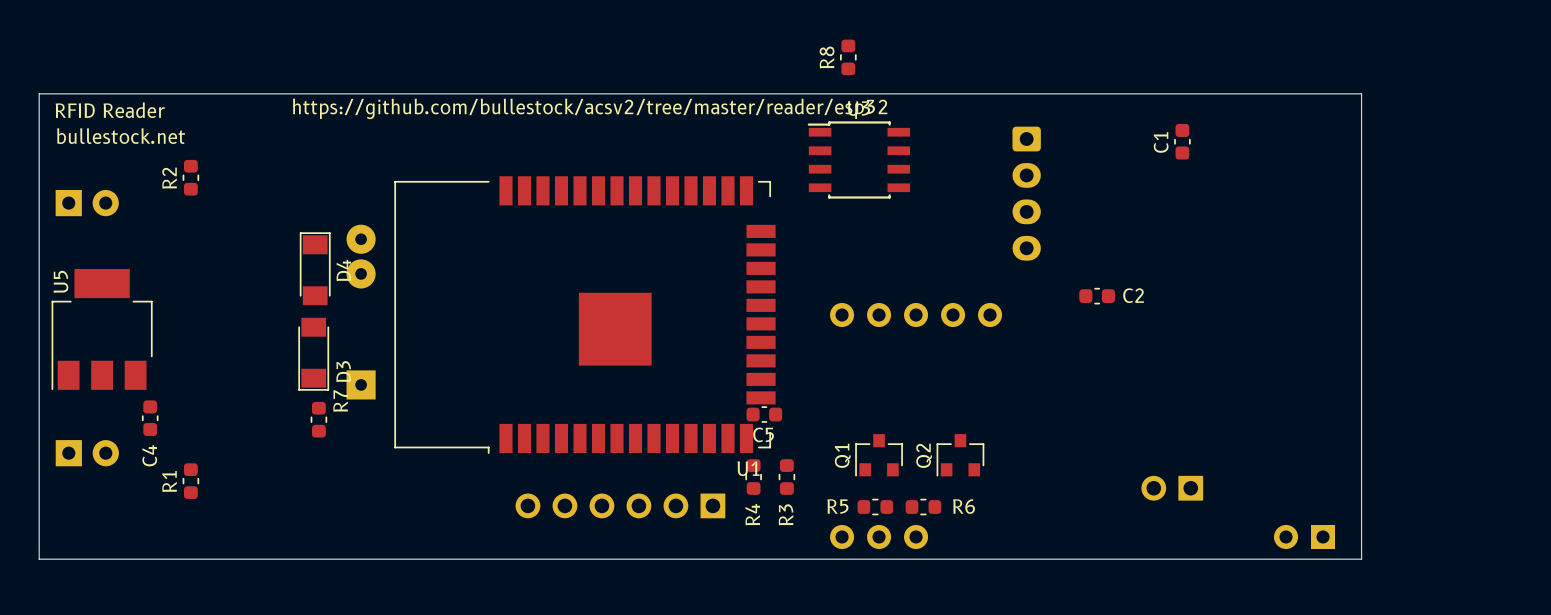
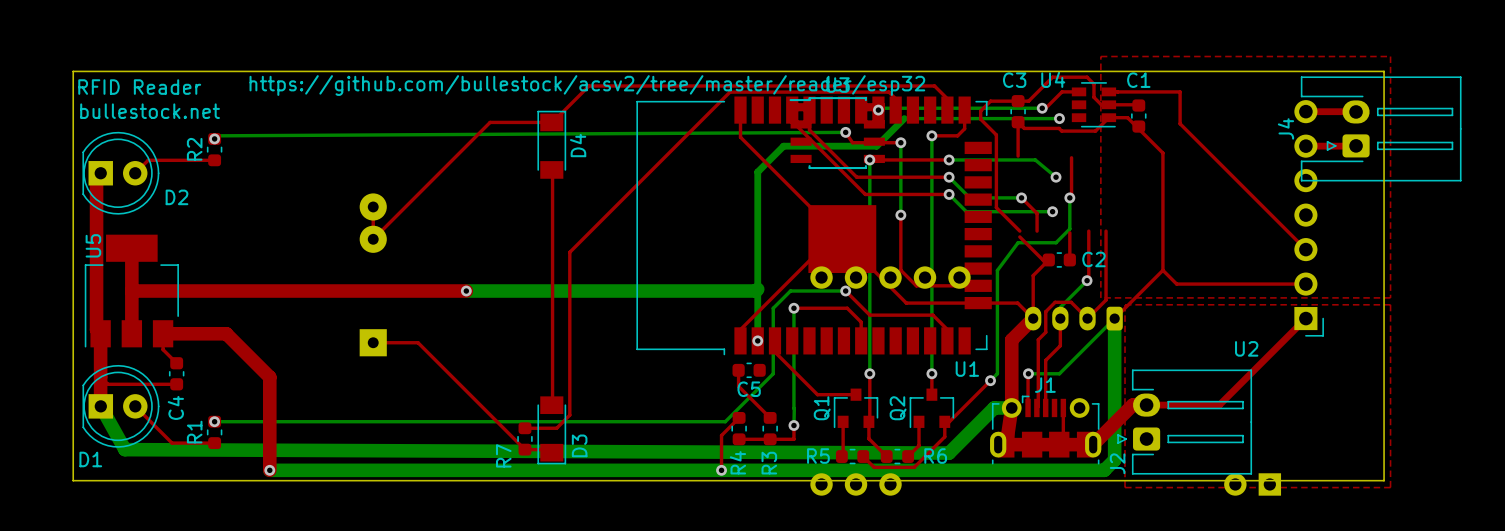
R8: (848, 57) -> none
top zone outline: none -> (1100, 56) (1100, 297) (1390, 297) (1390, 56) (1100, 56)
board edge: (1361, 93) (1361, 559) (39, 559) (39, 532) -> (1305, 71) (1384, 71) (1384, 480) (73, 480)
top track: none -> (1079, 91) (1062, 91) (1045, 108) (1042, 108) (1044, 106)
top track: none -> (1108, 91) (1180, 91) (1180, 123) (1305, 249)
top track: none -> (895, 98) (888, 92) (729, 92) (569, 252) (569, 415) (556, 428) (524, 428)
top track: none -> (947, 98) (934, 86) (588, 86) (552, 122) (490, 122) (373, 239) (373, 206)
U4: none -> (1093, 104)
top track: none -> (1137, 104) (1101, 104) (1093, 97) (1093, 84) (1087, 77) (1052, 77) (1028, 101) (990, 101) (980, 111) (980, 119) (996, 134) (996, 207) (1019, 231)
bottom track: none -> (1042, 108) (880, 108) (878, 110)
via: none -> (1042, 108)
top track: none -> (740, 110) (740, 137) (906, 303) (1017, 303) (1033, 318)
top track: none -> (809, 110) (809, 129) (856, 177) (949, 177)
via: none -> (878, 110)
top track: none -> (964, 110) (964, 128) (957, 135) (931, 135)
C3: none -> (1018, 111)
top track: none -> (1305, 111) (1356, 111)
C1 name rotation: 0° (1161, 142) -> 90° clockwise (1138, 80)
C1 name position: C1 (1161, 142) -> C1 (1138, 80)
bottom track: none -> (1059, 118) (904, 118) (876, 146) (783, 146) (757, 172) (757, 340)
via: none -> (1059, 118)
top track: none -> (792, 121) (865, 194) (949, 194)
J4: none -> (1381, 128)
top track: none -> (845, 132) (852, 142) (900, 142)
bottom track: none -> (845, 132) (217, 135) (214, 138)
via: none -> (845, 132)
bottom track: none -> (931, 135) (931, 373)
via: none -> (931, 135)
via: none -> (214, 138)
bottom track: none -> (900, 142) (900, 215)
via: none -> (900, 142)
top track: none -> (1305, 146) (1356, 146)
top track: none -> (1018, 156) (1018, 122) (1024, 128) (1095, 131) (1108, 117) (1127, 117) (1162, 153) (1162, 270)
top track: none -> (1071, 157) (1071, 196) (1069, 197)
top track: none -> (869, 159) (949, 159)
bottom track: none -> (869, 159) (869, 373)
via: none -> (869, 159)
bottom track: none -> (949, 159) (1035, 159) (1056, 177)
via: none -> (949, 159)
top track: none -> (214, 160) (148, 160) (135, 173)
part: (1026, 193) -> none
top track: none -> (552, 169) (552, 405)
D2 side: bottom (87, 203) -> top (120, 173)
top track: none -> (96, 177) (96, 329) (100, 333) (100, 406)
bottom track: none -> (949, 177) (969, 197) (1021, 197)
via: none -> (949, 177)
via: none -> (1056, 177)
bottom track: none -> (949, 194) (966, 211) (1052, 211)
via: none -> (949, 194)
top track: none -> (1021, 197) (1037, 213) (1037, 231)
via: none -> (1021, 197)
bottom track: none -> (1069, 197) (1069, 228) (1056, 242) (1018, 242) (997, 270) (997, 373) (990, 380)
via: none -> (1069, 197)
via: none -> (1052, 211)
top track: none -> (900, 215) (900, 270) (916, 285) (978, 285)
via: none -> (900, 215)
U2: none -> (1309, 218)
top track: none -> (1088, 231) (1088, 278) (1087, 280)
top track: none -> (1106, 231) (1106, 300) (1087, 318) (1071, 302) (1055, 302) (1045, 311) (1045, 332) (1038, 339) (1036, 407)
top track: none -> (1069, 232) (1069, 259)
D4 position: (315, 268) -> (551, 144)
top track: none -> (1019, 236) (1042, 259) (1048, 259) (1033, 275) (1033, 318)
top track: none -> (831, 239) (740, 329)
top track: none -> (131, 248) (131, 333)
top track: none -> (1162, 270) (1176, 284) (1305, 284)
top track: none -> (1162, 270) (1114, 318)
U1 position: (584, 315) -> (814, 225)
bottom track: none -> (1087, 280) (1060, 307) (1060, 318)
via: none -> (1087, 280)
bottom track: none -> (757, 289) (756, 291) (466, 291)
top track: none -> (131, 291) (466, 291)
via: none -> (466, 291)
top track: none -> (845, 291) (869, 315) (932, 315) (947, 329)
bottom track: none -> (845, 291) (790, 291) (773, 308) (773, 373) (725, 421) (214, 421)
via: none -> (845, 291)
top zone outline: none -> (1125, 304) (1125, 487) (1390, 487) (1390, 304) (1125, 304)
top track: none -> (793, 308) (847, 308) (861, 322) (861, 340)
bottom track: none -> (793, 308) (793, 425)
via: none -> (793, 308)
D3 position: (313, 354) -> (551, 430)
top track: none -> (1305, 318) (1219, 405) (1132, 405) (1093, 444) (998, 444)
top track: none -> (1033, 318) (1011, 340) (1011, 407) (1006, 444)
top track: none -> (1060, 318) (1060, 345) (1045, 360) (1045, 407)
part: none -> (1073, 318)
via: none -> (757, 340)
top track: none -> (373, 342) (418, 342) (524, 449) (549, 449)
top track: none -> (774, 352) (817, 394) (856, 394)
R7 name position: R7 (340, 401) -> R7 (503, 455)
top track: none -> (176, 363) (163, 349) (163, 333) (226, 333) (269, 377) (269, 470)
top track: none -> (738, 370) (738, 386) (770, 417)
top track: none -> (869, 373) (869, 420)
via: none -> (869, 373)
top track: none -> (931, 373) (931, 394)
via: none -> (931, 373)
top track: none -> (1028, 373) (1028, 407)
bottom track: none -> (1028, 373) (1059, 373) (1114, 318) (1114, 459) (1104, 470) (269, 470)
via: none -> (1028, 373)
R7 position: (318, 419) -> (524, 438)
top track: none -> (100, 377) (107, 384) (176, 384)
top track: none -> (990, 380) (949, 421) (944, 421) (944, 436) (914, 467) (874, 467) (863, 456)
via: none -> (990, 380)
bottom track: none -> (100, 406) (124, 449) (949, 453) (994, 407) (1011, 407)
D1 side: bottom (87, 453) -> top (120, 406)
top track: none -> (135, 406) (172, 443) (214, 443)
top track: none -> (1063, 407) (1063, 440)
top track: none -> (739, 417) (721, 435) (721, 470)
via: none -> (214, 421)
top track: none -> (843, 421) (843, 455)
top track: none -> (868, 421) (868, 438) (886, 456)
top track: none -> (918, 421) (918, 445) (908, 456)
J2: none -> (1184, 422)
top track: none -> (793, 425) (793, 439) (739, 439)
via: none -> (793, 425)
J1: none -> (1045, 430)
part: (1172, 488) -> none
part: (620, 505) -> none
via: none -> (269, 470)
via: none -> (721, 470)

